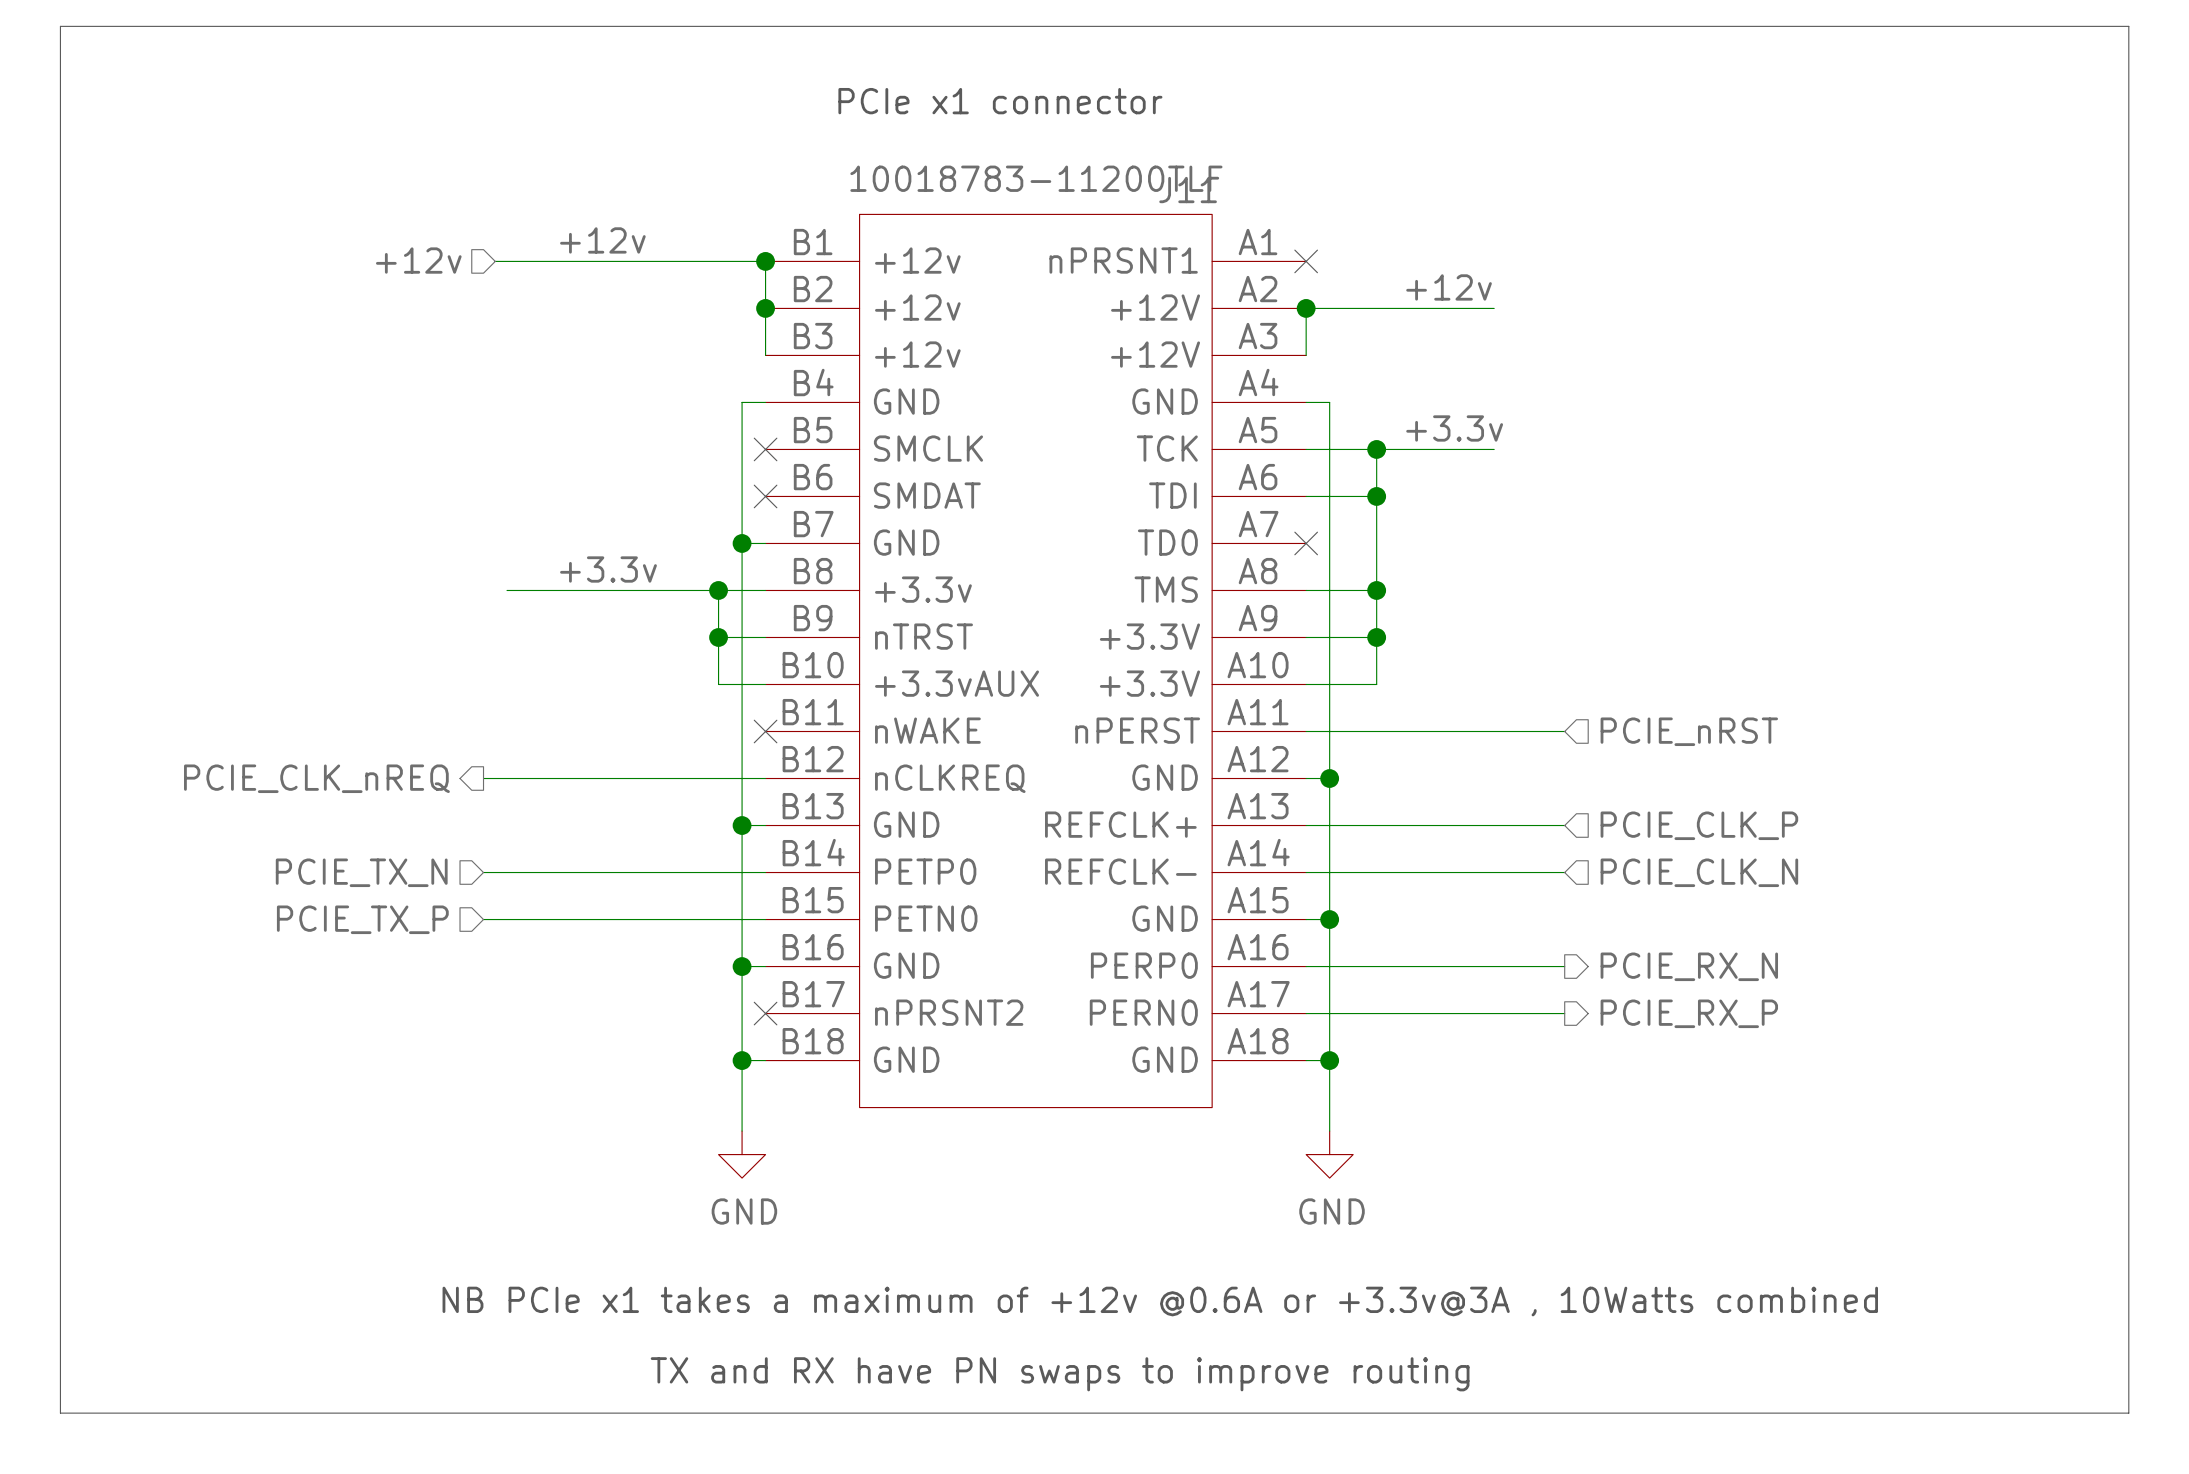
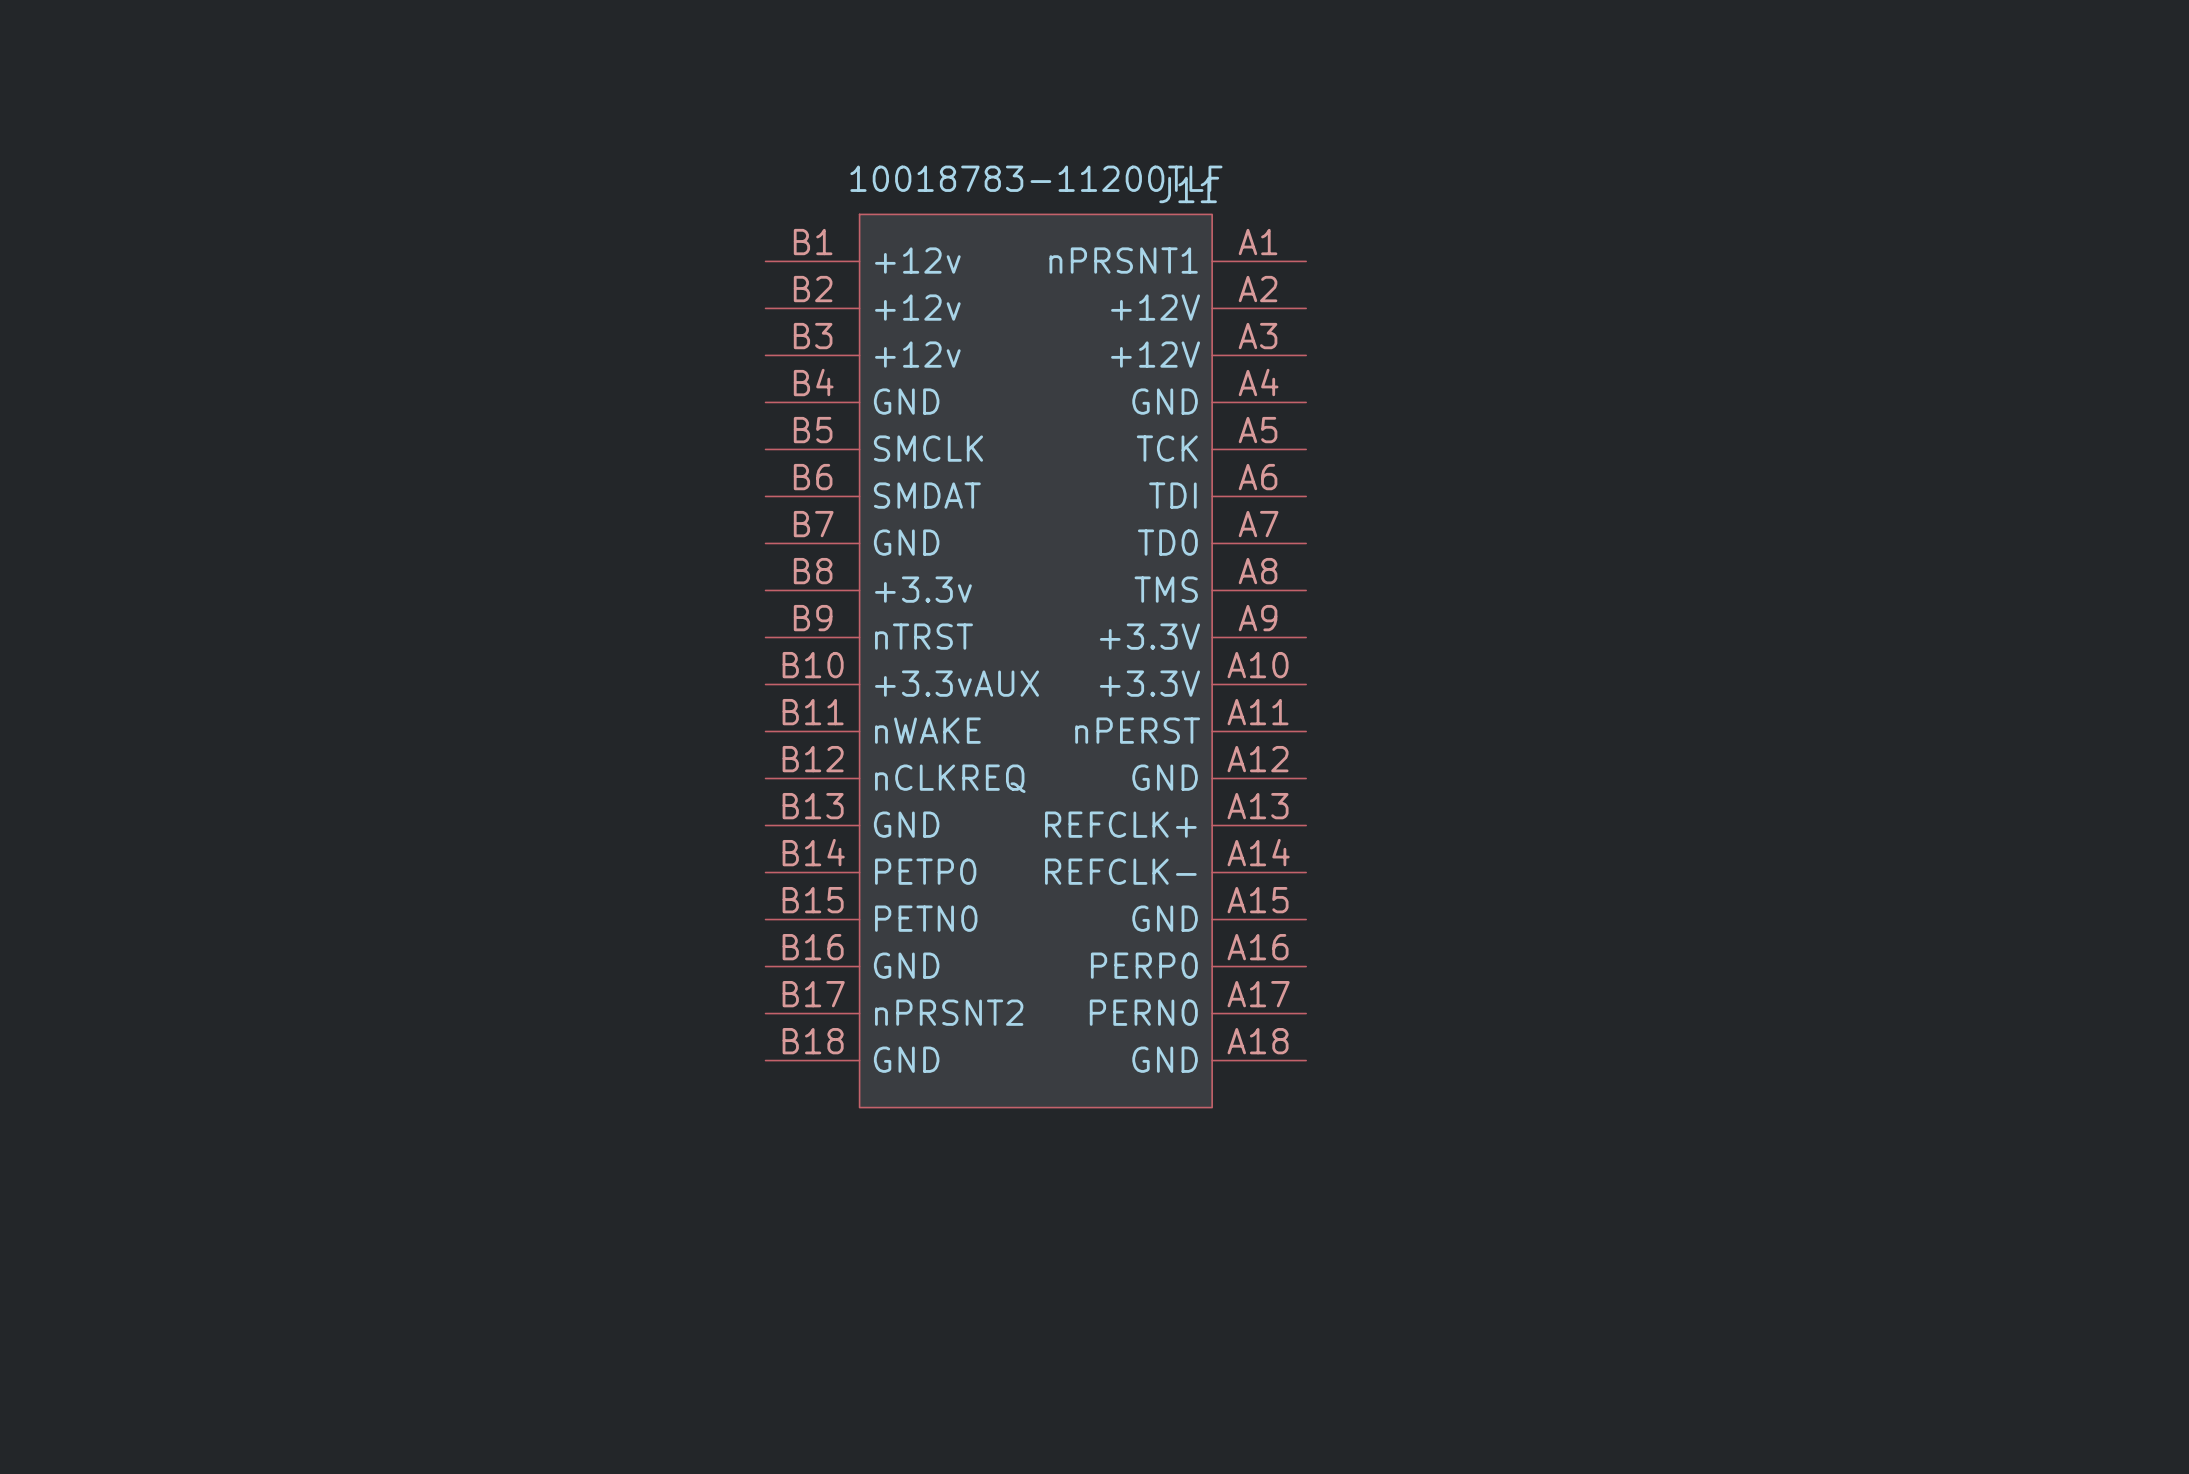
line: (60, 26) (60, 1413) (2128, 1413) (2128, 26) (60, 26) -> none
text: PCIe x1 connector (1000, 101) -> none
label: +12v (602, 240) -> none
hierarchical label: +12v (418, 260) -> none
wire: (495, 261) (765, 261) (765, 355) -> none
junction: (765, 261) -> none
no-connect mark: (1306, 261) -> none
label: +12v (1449, 287) -> none
junction: (765, 308) -> none
junction: (1306, 308) -> none
wire: (1494, 308) (1306, 308) (1306, 355) -> none
wire: (765, 402) (742, 402) (742, 1131) -> none
wire: (1306, 402) (1329, 402) (1329, 1131) -> none
label: +3.3v (1454, 428) -> none
no-connect mark: (765, 449) -> none
wire: (1306, 449) (1494, 449) -> none
wire: (1376, 449) (1376, 684) (1306, 684) -> none
junction: (1376, 449) -> none
no-connect mark: (765, 496) -> none
wire: (1306, 496) (1376, 496) -> none
junction: (1376, 496) -> none
wire: (742, 543) (765, 543) -> none
junction: (742, 543) -> none
no-connect mark: (1306, 543) -> none
label: +3.3v (608, 569) -> none
wire: (507, 590) (765, 590) -> none
wire: (718, 590) (718, 684) (765, 684) -> none
junction: (718, 590) -> none
wire: (1306, 590) (1376, 590) -> none
junction: (1376, 590) -> none
wire: (718, 637) (765, 637) -> none
junction: (718, 637) -> none
wire: (1306, 637) (1376, 637) -> none
junction: (1376, 637) -> none
no-connect mark: (765, 731) -> none
wire: (1306, 731) (1564, 731) -> none
hierarchical label: PCIE_nRST (1689, 731) -> none
hierarchical label: PCIE_CLK_nREQ (316, 778) -> none
wire: (483, 778) (765, 778) -> none
wire: (1306, 778) (1329, 778) -> none
junction: (1329, 778) -> none
wire: (742, 825) (765, 825) -> none
junction: (742, 825) -> none
wire: (1306, 825) (1564, 825) -> none
hierarchical label: PCIE_CLK_P (1699, 825) -> none
hierarchical label: PCIE_TX_N (361, 872) -> none
wire: (483, 872) (765, 872) -> none
wire: (1306, 872) (1564, 872) -> none
hierarchical label: PCIE_CLK_N (1699, 872) -> none
hierarchical label: PCIE_TX_P (362, 919) -> none
wire: (483, 919) (765, 919) -> none
wire: (1306, 919) (1329, 919) -> none
junction: (1329, 919) -> none
wire: (742, 966) (765, 966) -> none
junction: (742, 966) -> none
wire: (1306, 966) (1564, 966) -> none
hierarchical label: PCIE_RX_N (1689, 966) -> none
no-connect mark: (765, 1013) -> none
wire: (1306, 1013) (1564, 1013) -> none
hierarchical label: PCIE_RX_P (1689, 1013) -> none
wire: (742, 1060) (765, 1060) -> none
junction: (742, 1060) -> none
wire: (1306, 1060) (1329, 1060) -> none
junction: (1329, 1060) -> none
power symbol: GND (742, 1154) -> none
power symbol: GND (1329, 1154) -> none
text: NB PCIe x1 takes a maximum of +12v @0.6A or +3.3v@3A , 10Watts combined (1160, 1301) -> none
text: TX and RX have PN swaps to improve routing (1060, 1374) -> none

